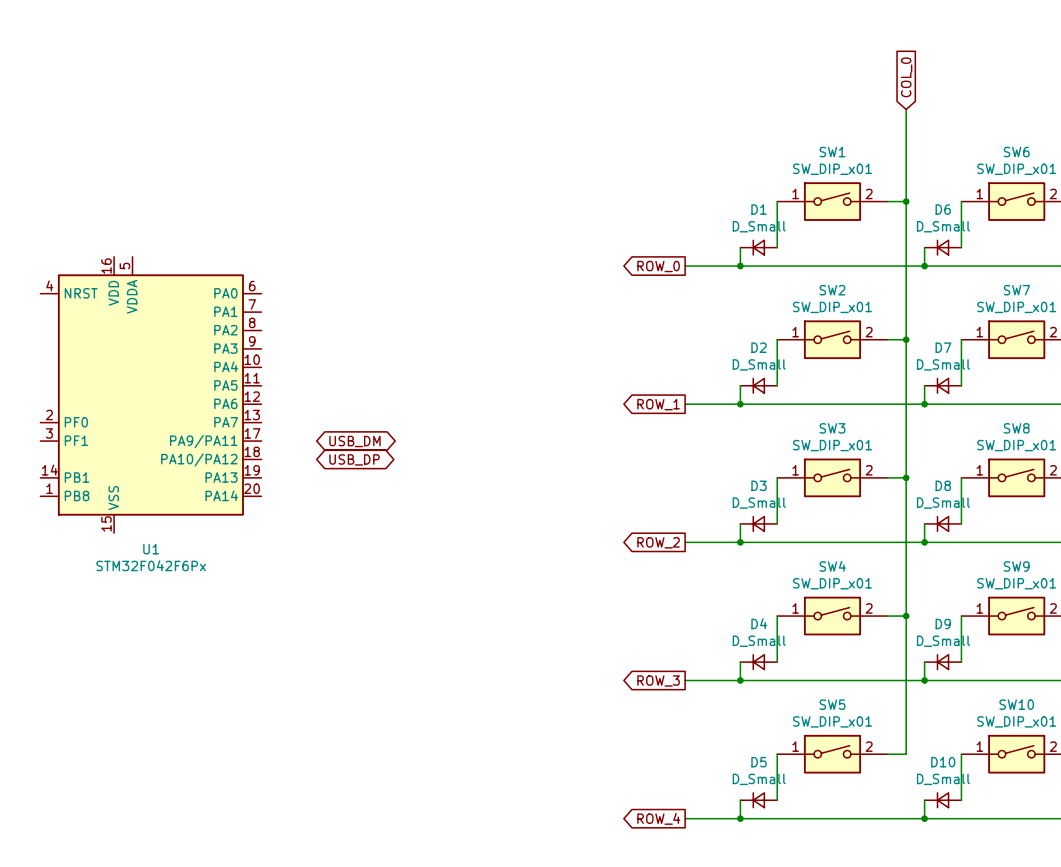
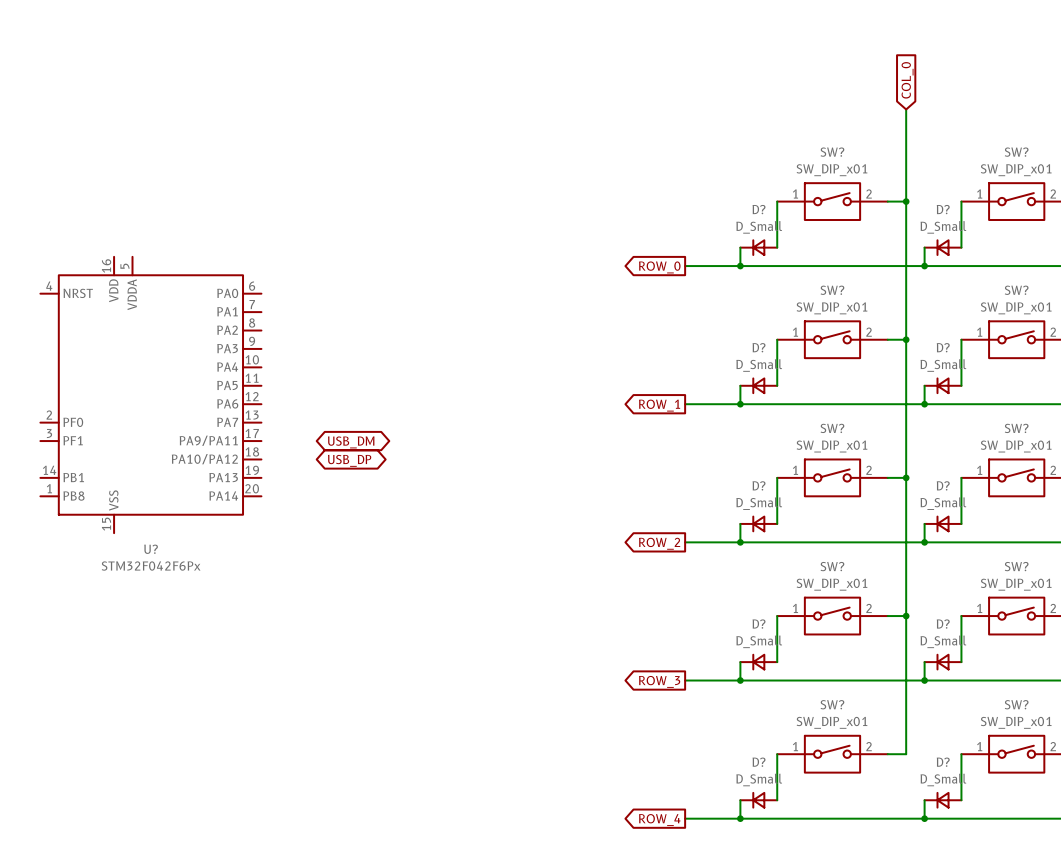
SW1 name: SW1 (832, 152) -> SW? (832, 152)
SW6 name: SW6 (1016, 152) -> SW? (1016, 152)
D1 name: D1 (759, 209) -> D? (759, 209)
D6 name: D6 (943, 209) -> D? (943, 209)
SW2 name: SW2 (832, 290) -> SW? (832, 290)
SW7 name: SW7 (1016, 290) -> SW? (1016, 290)
D2 name: D2 (759, 347) -> D? (759, 347)
D7 name: D7 (943, 347) -> D? (943, 347)
SW3 name: SW3 (832, 428) -> SW? (832, 428)
SW8 name: SW8 (1016, 428) -> SW? (1016, 428)
D3 name: D3 (759, 485) -> D? (759, 485)
D8 name: D8 (943, 485) -> D? (943, 485)
U1 name: U1 (151, 549) -> U? (151, 549)
SW4 name: SW4 (832, 566) -> SW? (832, 566)
SW9 name: SW9 (1016, 566) -> SW? (1016, 566)
D4 name: D4 (759, 623) -> D? (759, 624)
D9 name: D9 (943, 623) -> D? (943, 624)
SW5 name: SW5 (832, 704) -> SW? (832, 704)
SW10 name: SW10 (1016, 704) -> SW? (1016, 704)
D5 name: D5 (759, 762) -> D? (759, 762)
D10 name: D10 (943, 762) -> D? (943, 762)

